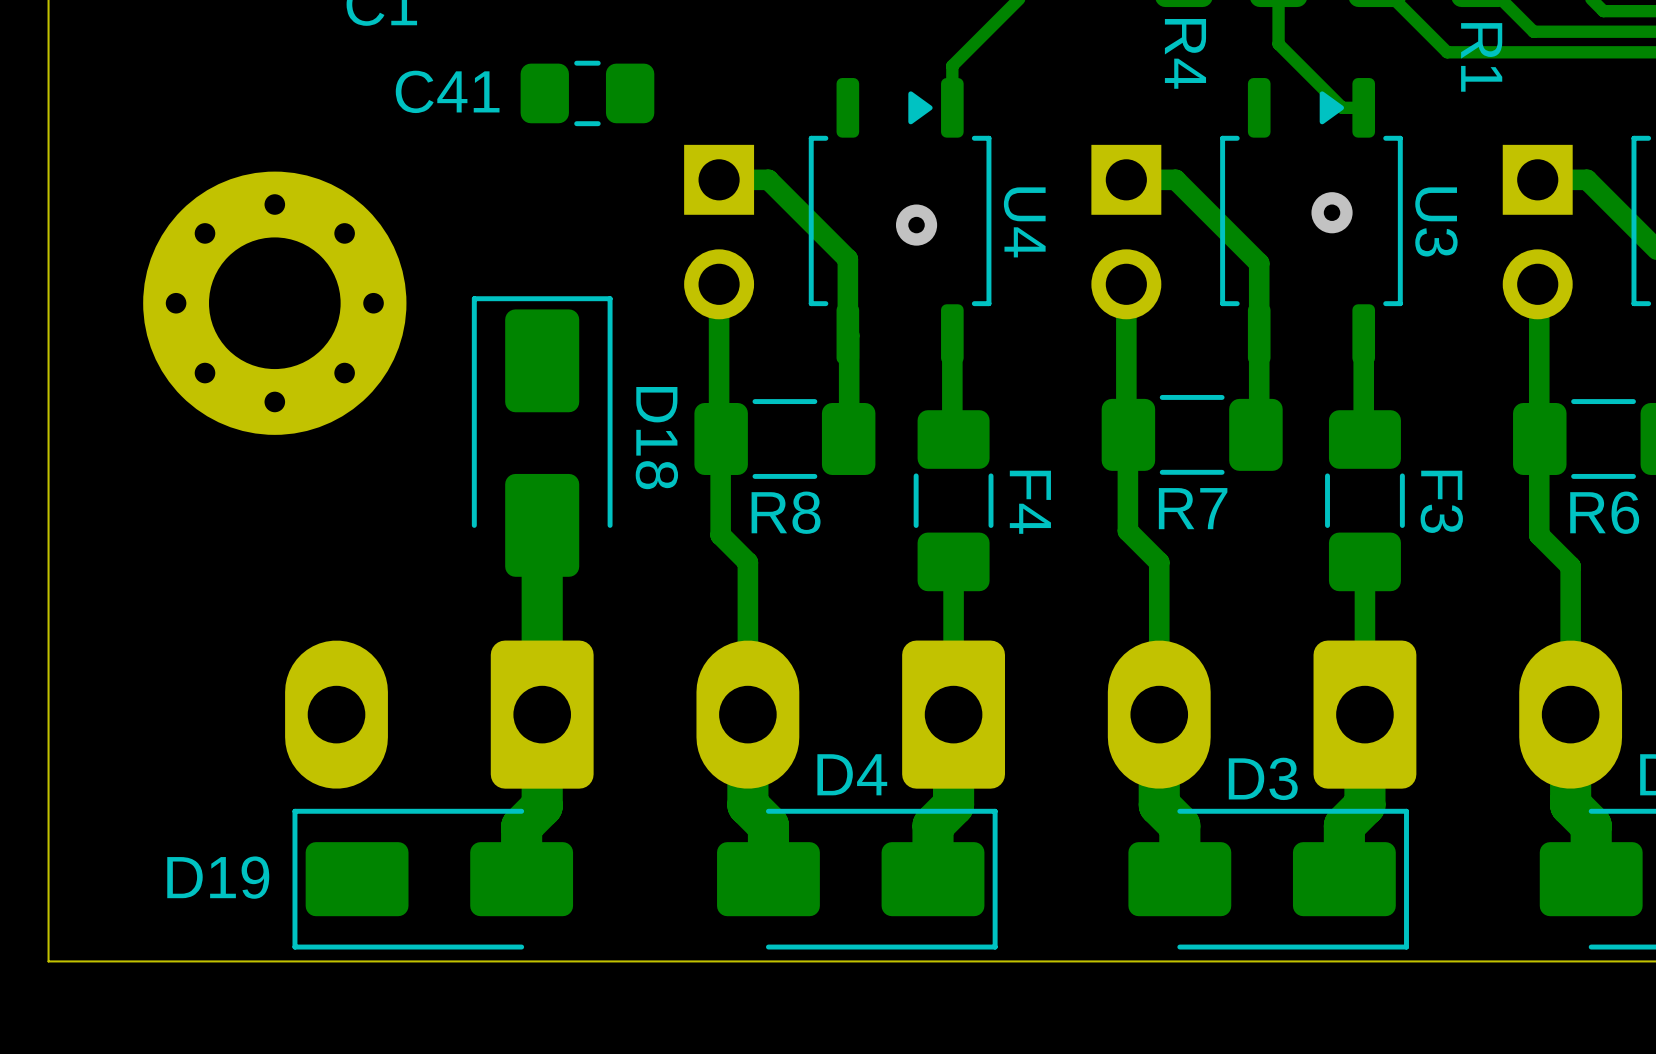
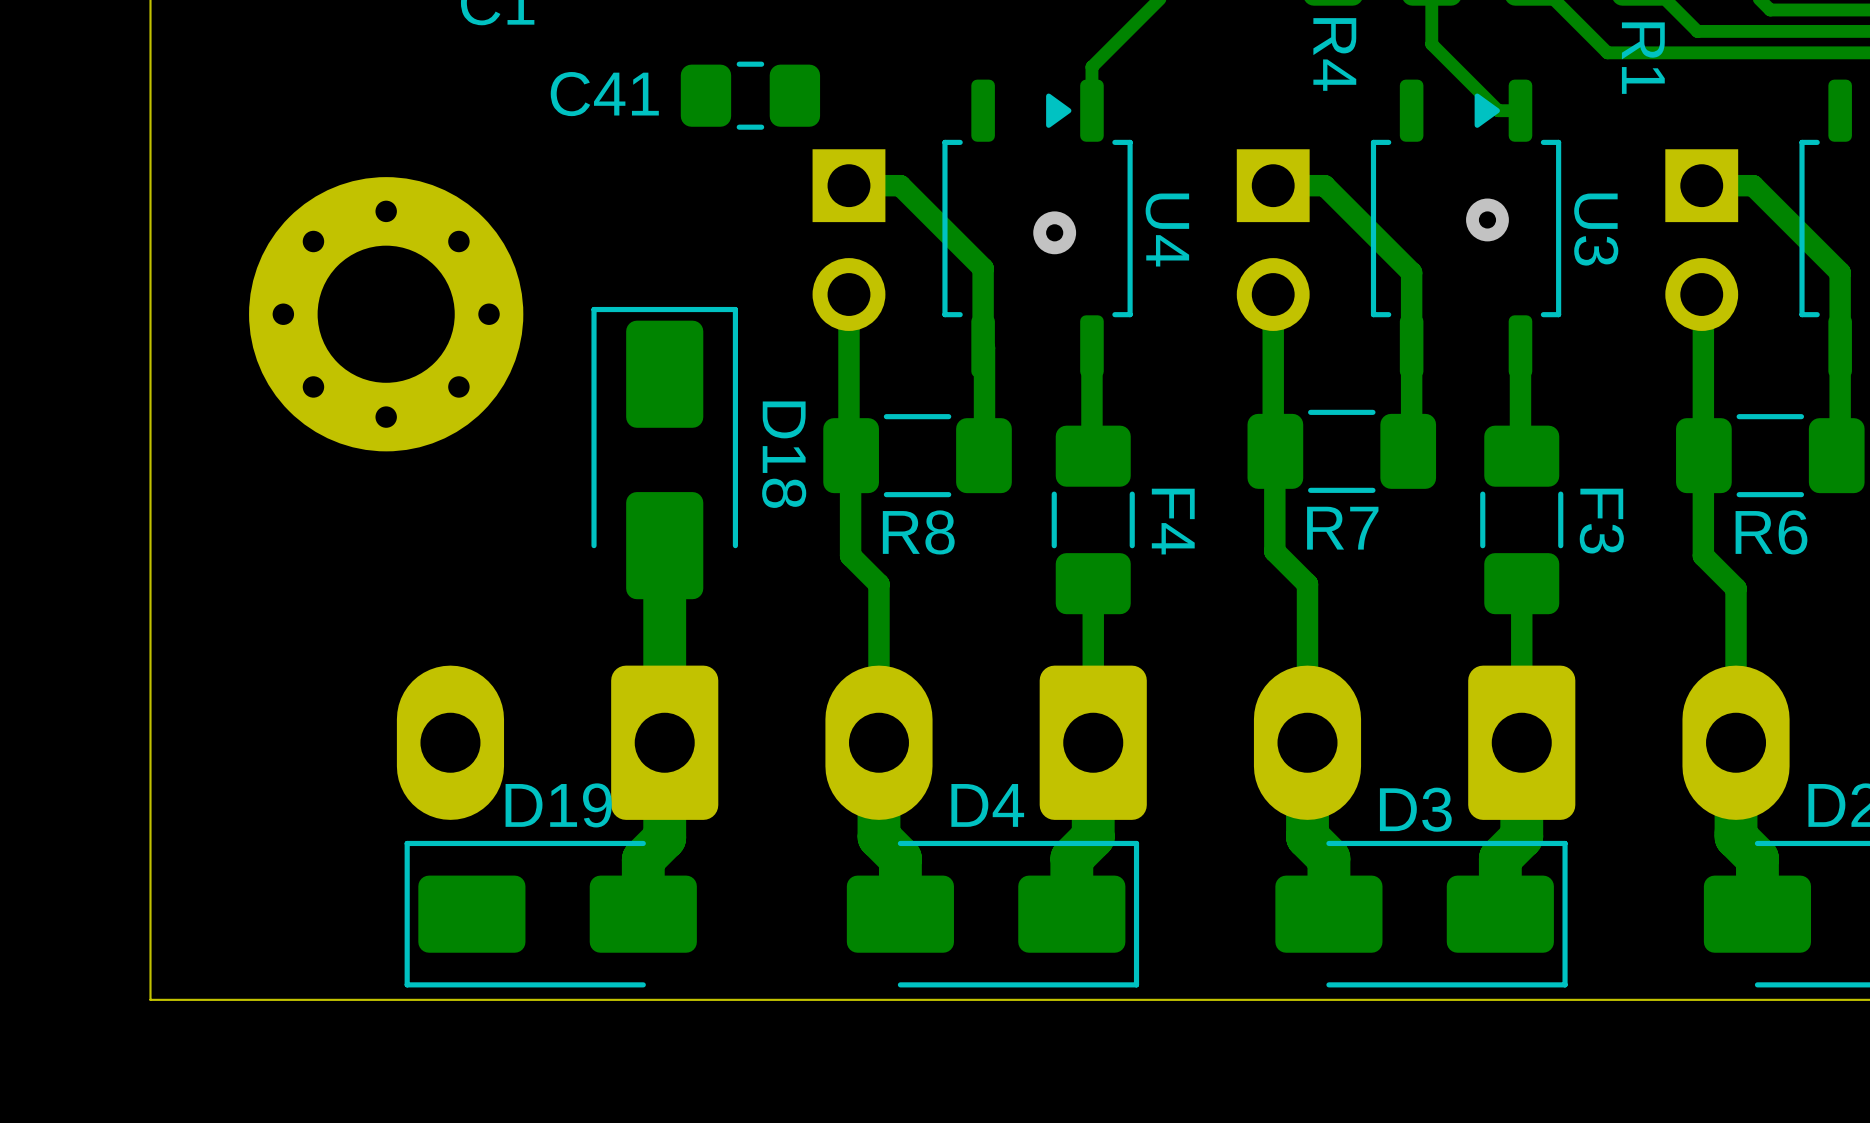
C41 position: (587, 93) -> (750, 95)
D19 name position: D19 (218, 877) -> D19 (558, 805)

